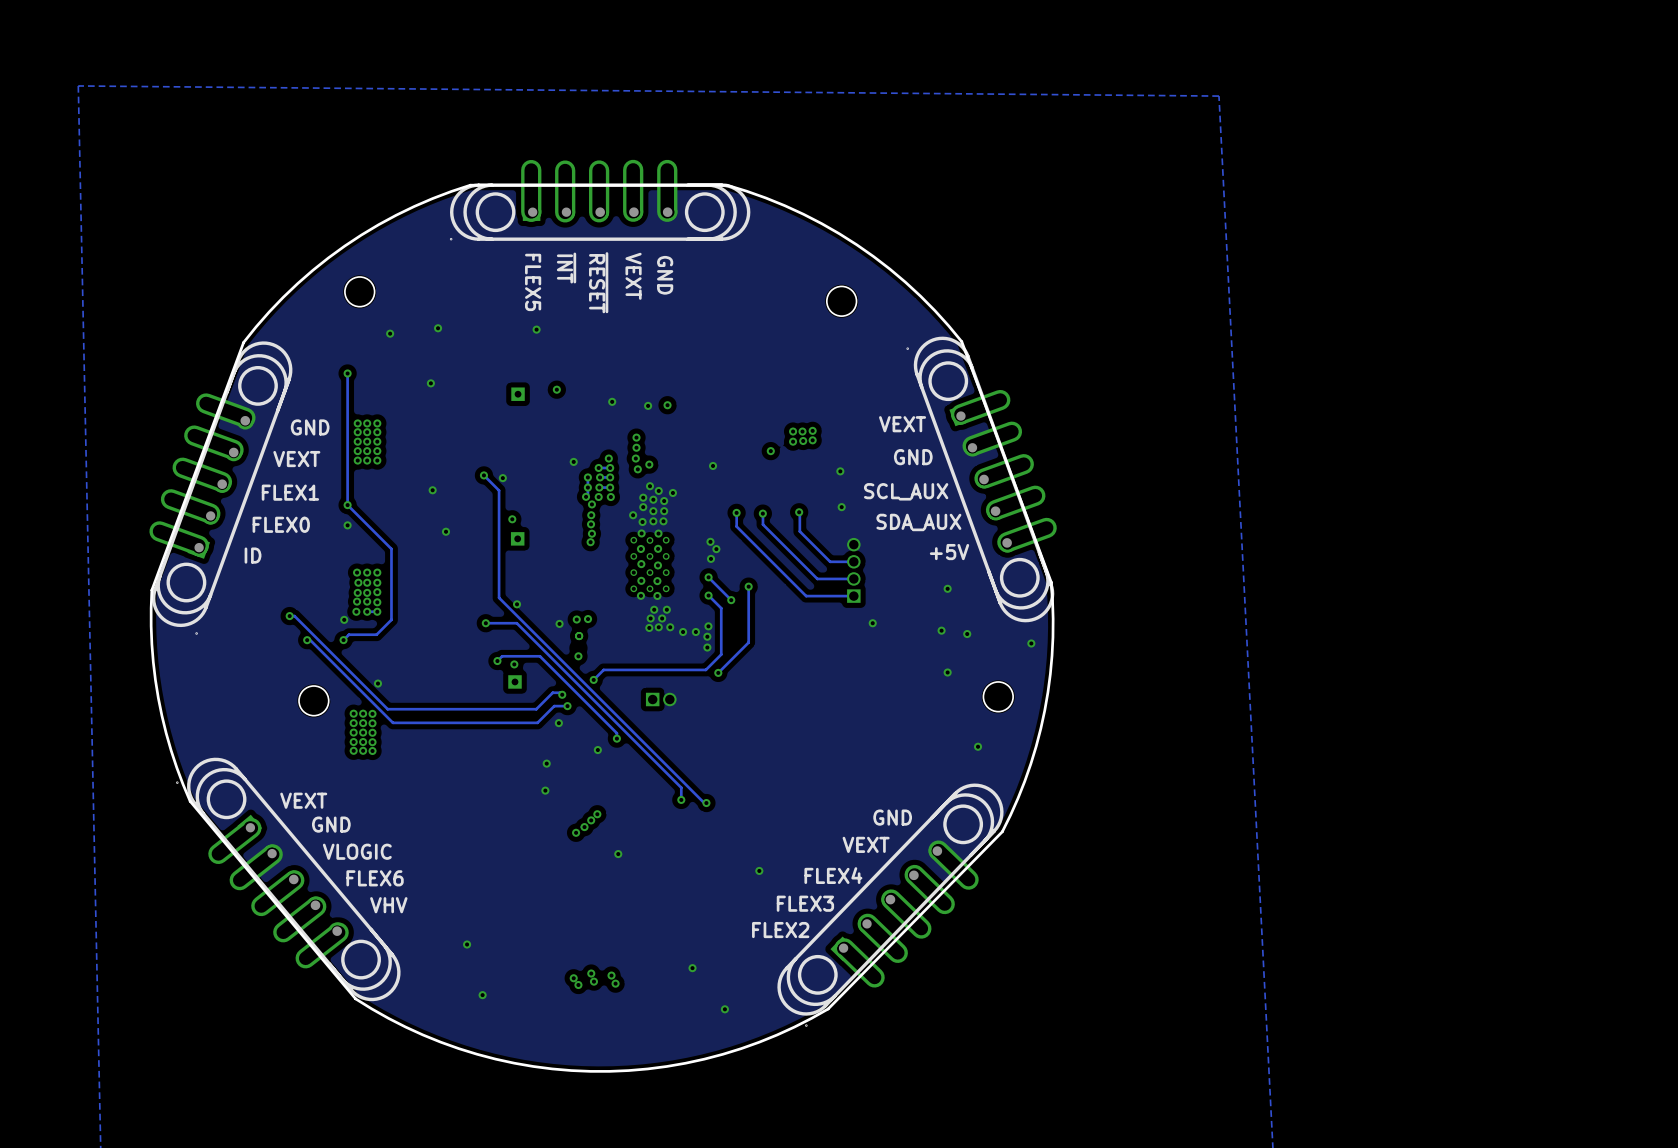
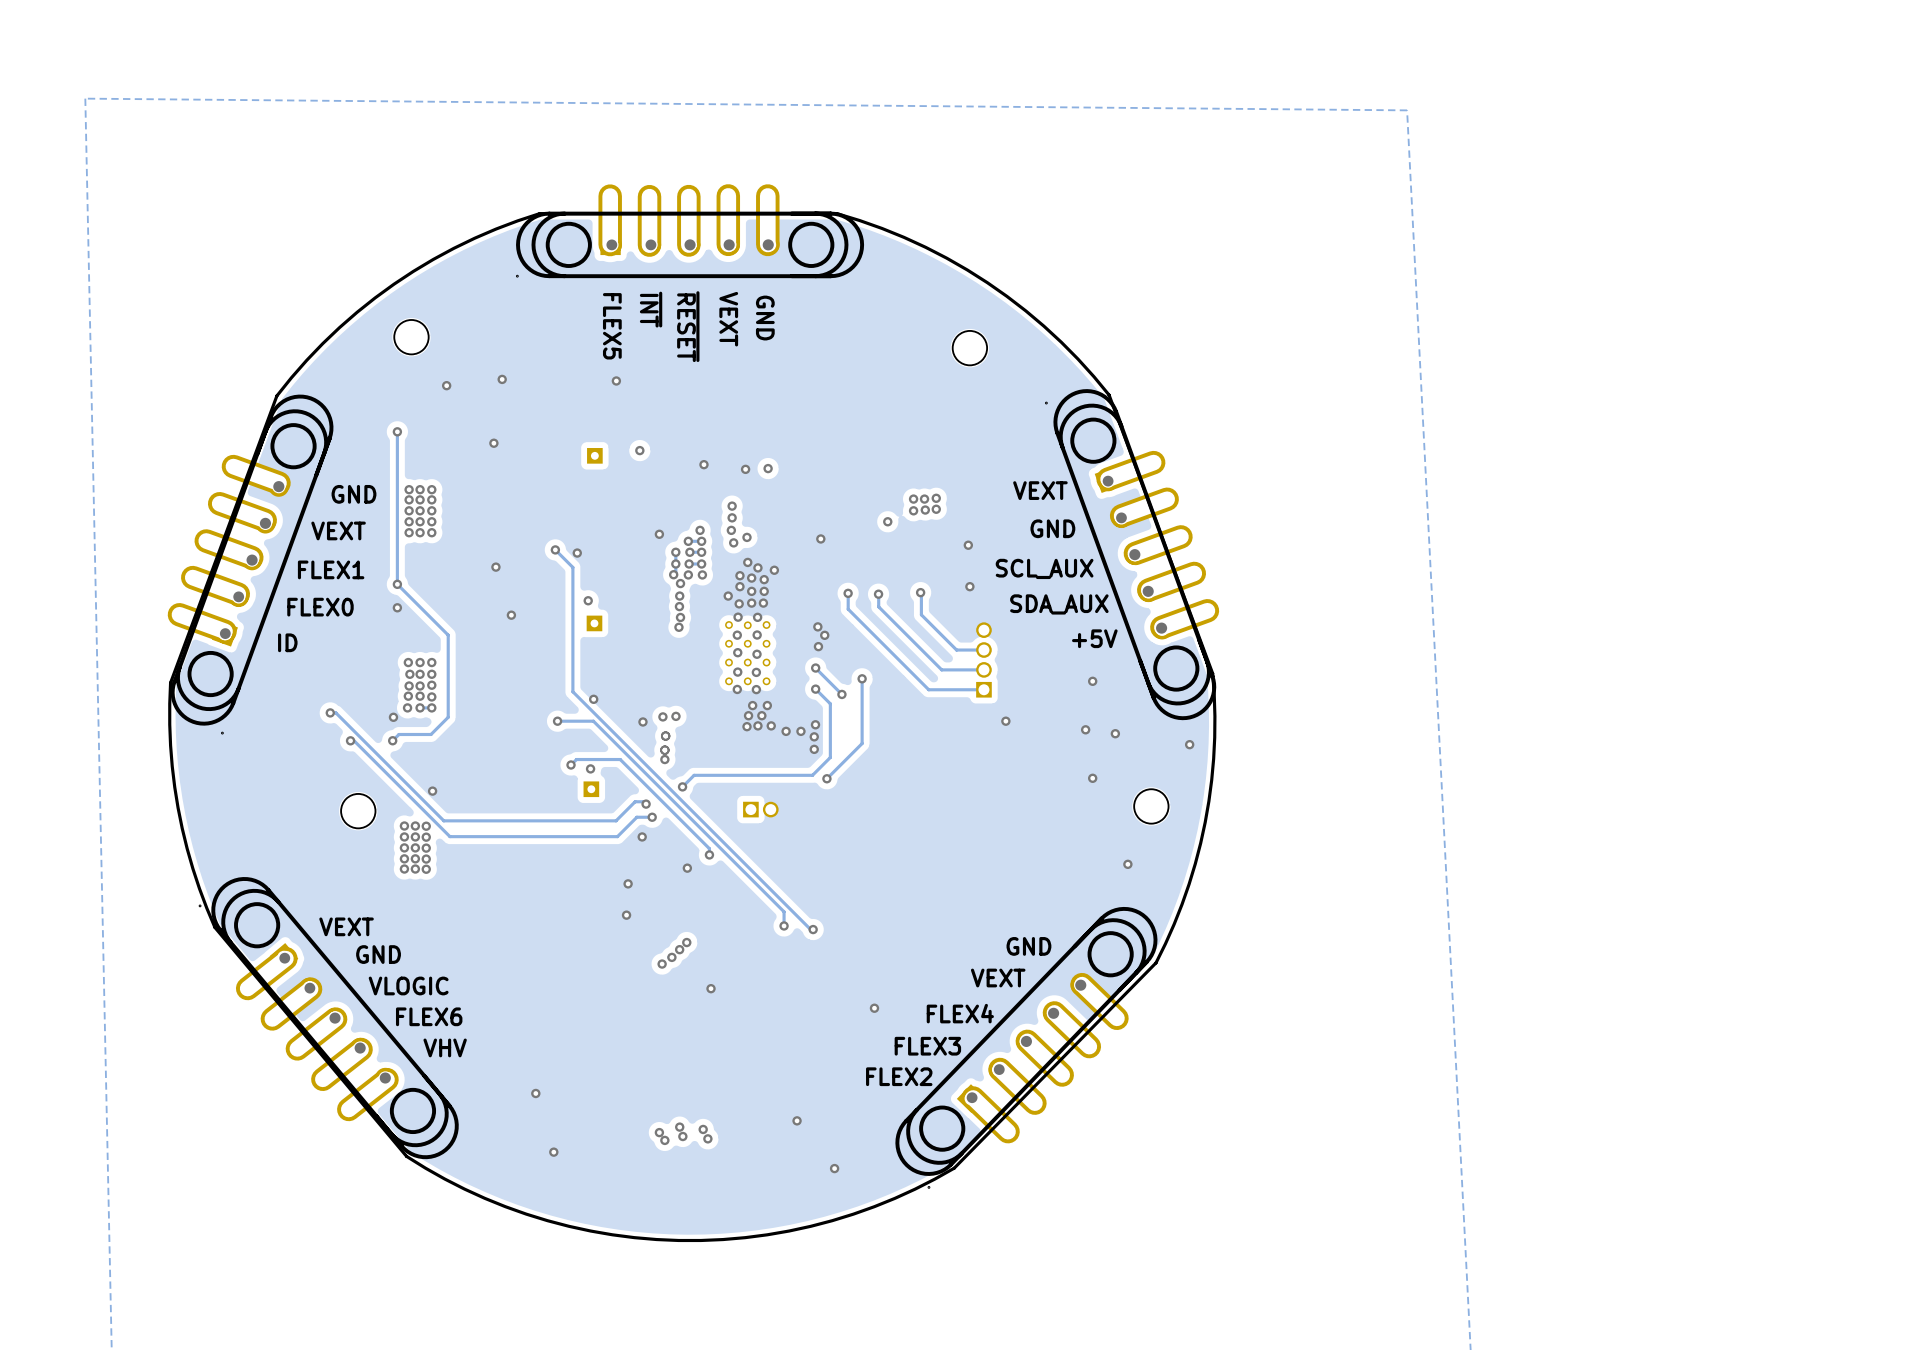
via: none -> (664, 750)

